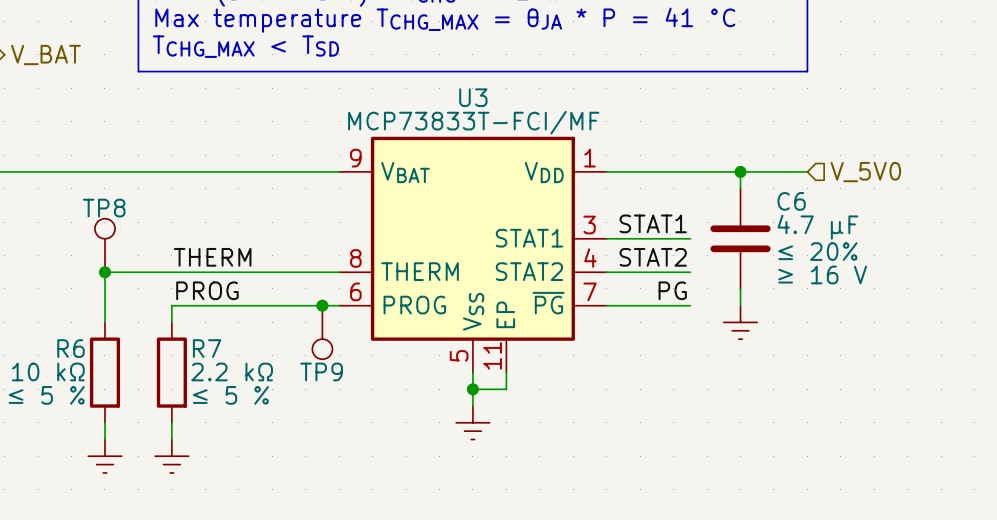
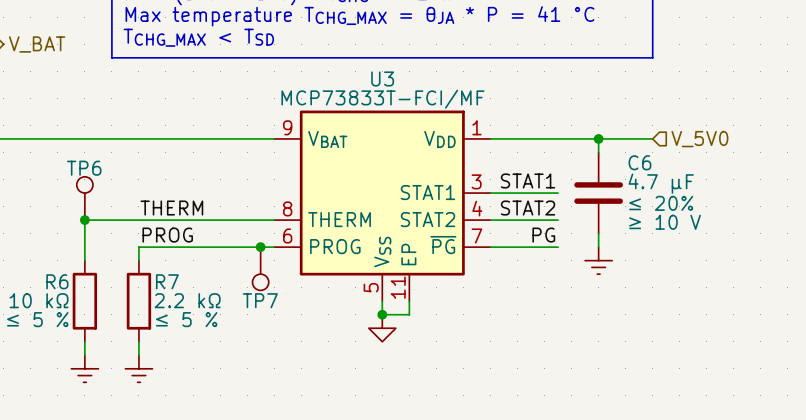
TP8 name: TP8 (104, 208) -> TP6 (84, 168)
C6 text: ≥ 16 V (822, 274) -> ≥ 10 V (665, 222)
TP9 name: TP9 (321, 371) -> TP7 (260, 300)
power symbol: none -> (382, 328)
power symbol: (472, 422) -> none

